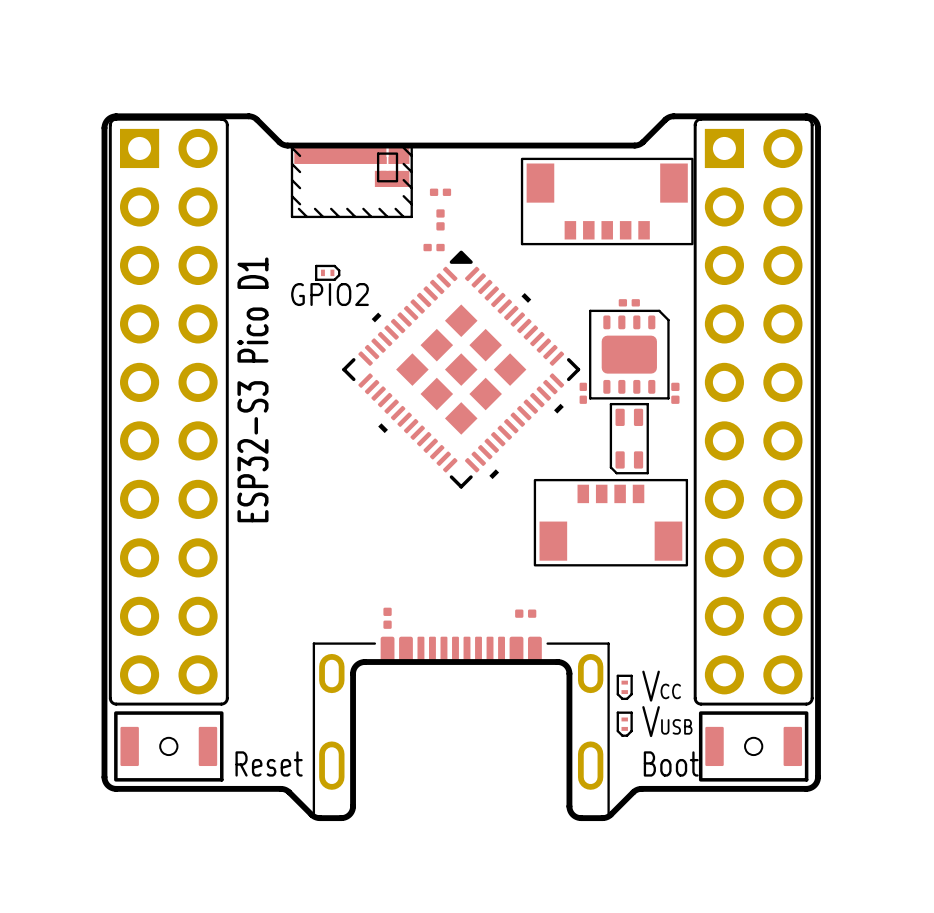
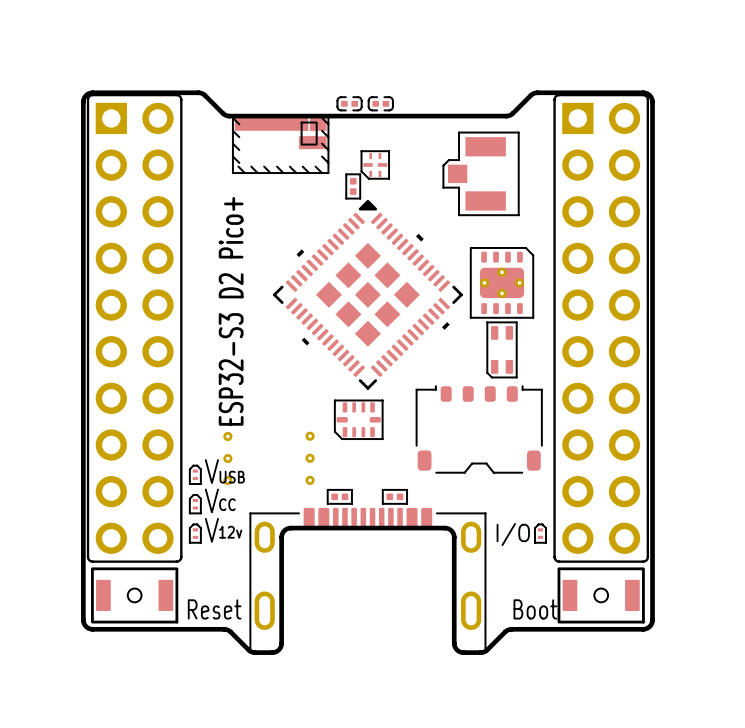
part: none -> (349, 103)
part: none -> (380, 103)
part footprint: [520, 157, 694, 246] -> [442, 131, 520, 217]
part: (440, 192) -> none
part: none -> (375, 164)
part: (440, 219) -> none
part: none -> (353, 186)
part: (434, 247) -> none
part footprint: [342, 250, 581, 489] -> [273, 199, 463, 390]
part: (327, 272) -> none
text: GPIO2 (329, 294) -> none
part: (629, 302) -> none
part footprint: [589, 309, 670, 400] -> [469, 247, 535, 319]
text: ESP32-S3 Pico D1 (252, 389) -> ESP32-S3 D2 Pico+ (231, 311)
part: (583, 393) -> none
part: (675, 393) -> none
part footprint: [533, 478, 689, 567] -> [415, 385, 543, 474]
part: none -> (358, 419)
part: none -> (227, 458)
part: none -> (310, 458)
text: none -> V (211, 471)
part: none -> (195, 474)
part: (525, 613) -> none
part: (387, 618) -> none
part: none -> (339, 496)
part: none -> (394, 496)
text: none -> V (211, 500)
part: none -> (195, 504)
text: none -> V (211, 530)
text: none -> 12v (230, 532)
part: none -> (195, 533)
part: none -> (540, 533)
text: none -> I/O (513, 534)
text: V (651, 686) -> none
part: (624, 687) -> none
text position: CC (670, 691) -> CC (227, 504)
text: V (651, 721) -> none
part: (624, 724) -> none
text position: USB (676, 726) -> USB (232, 477)

